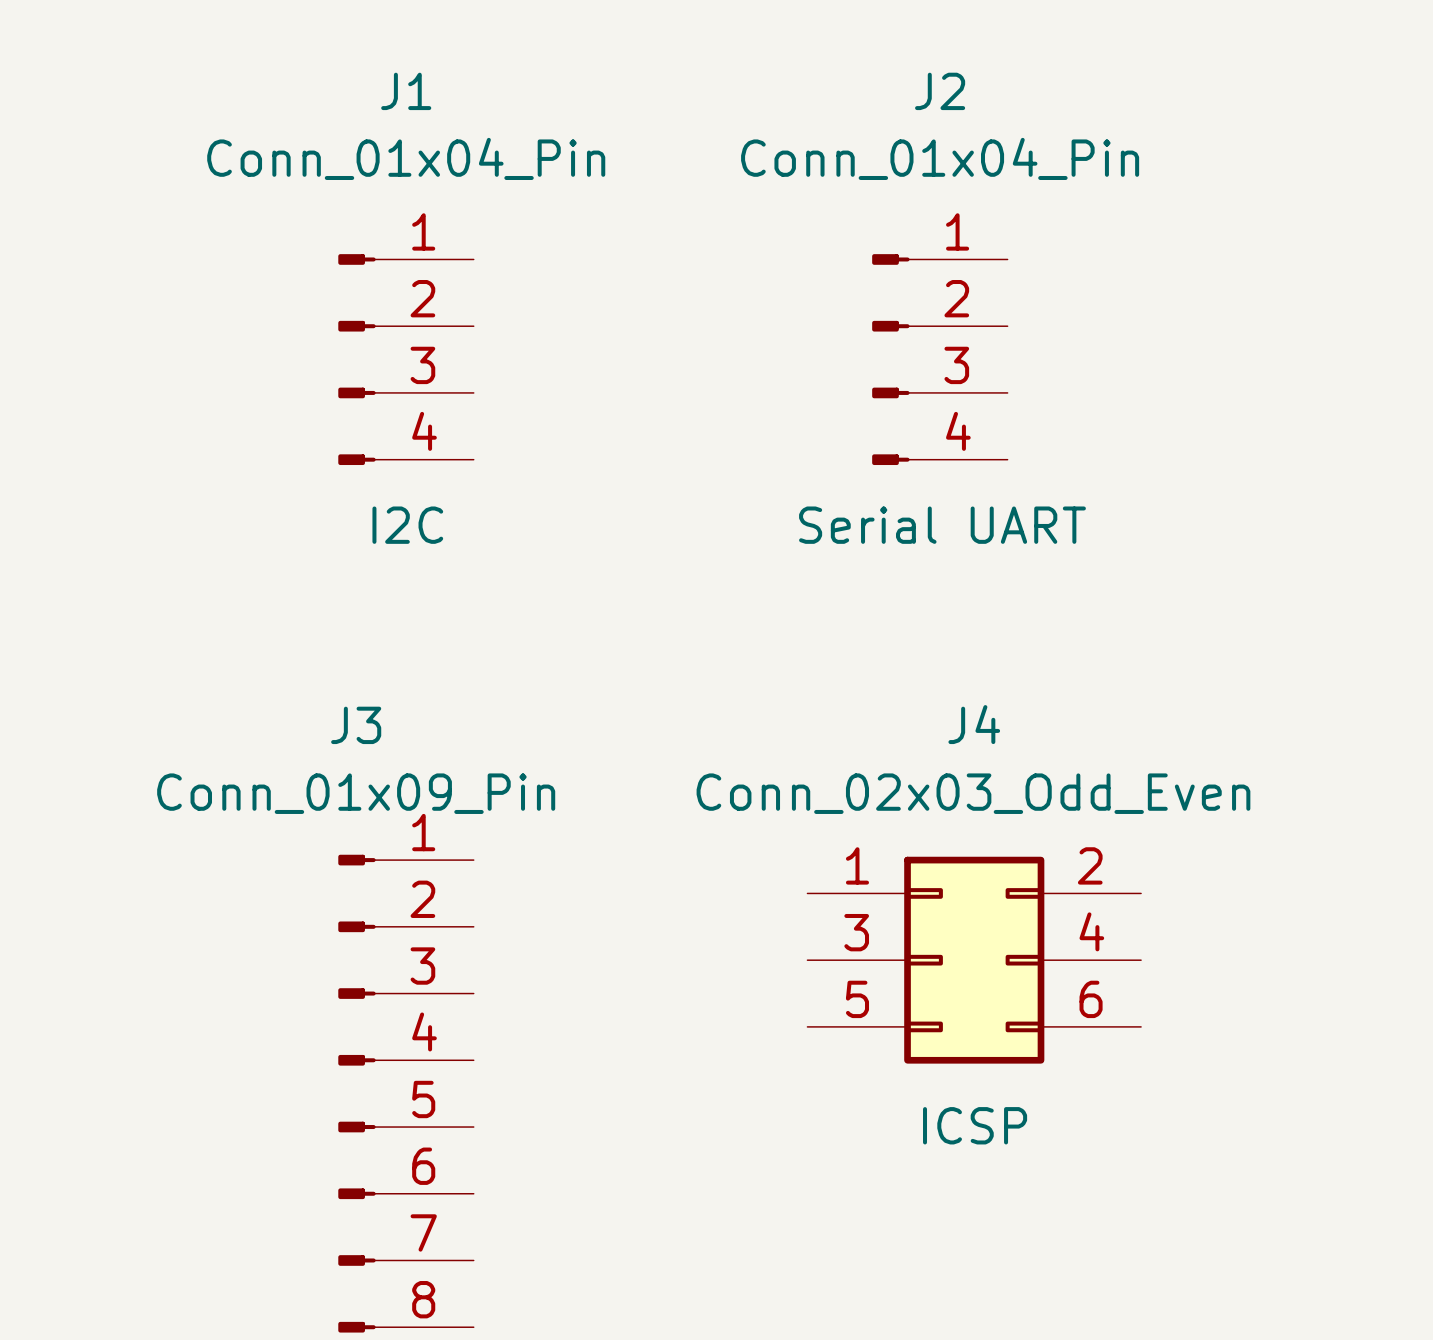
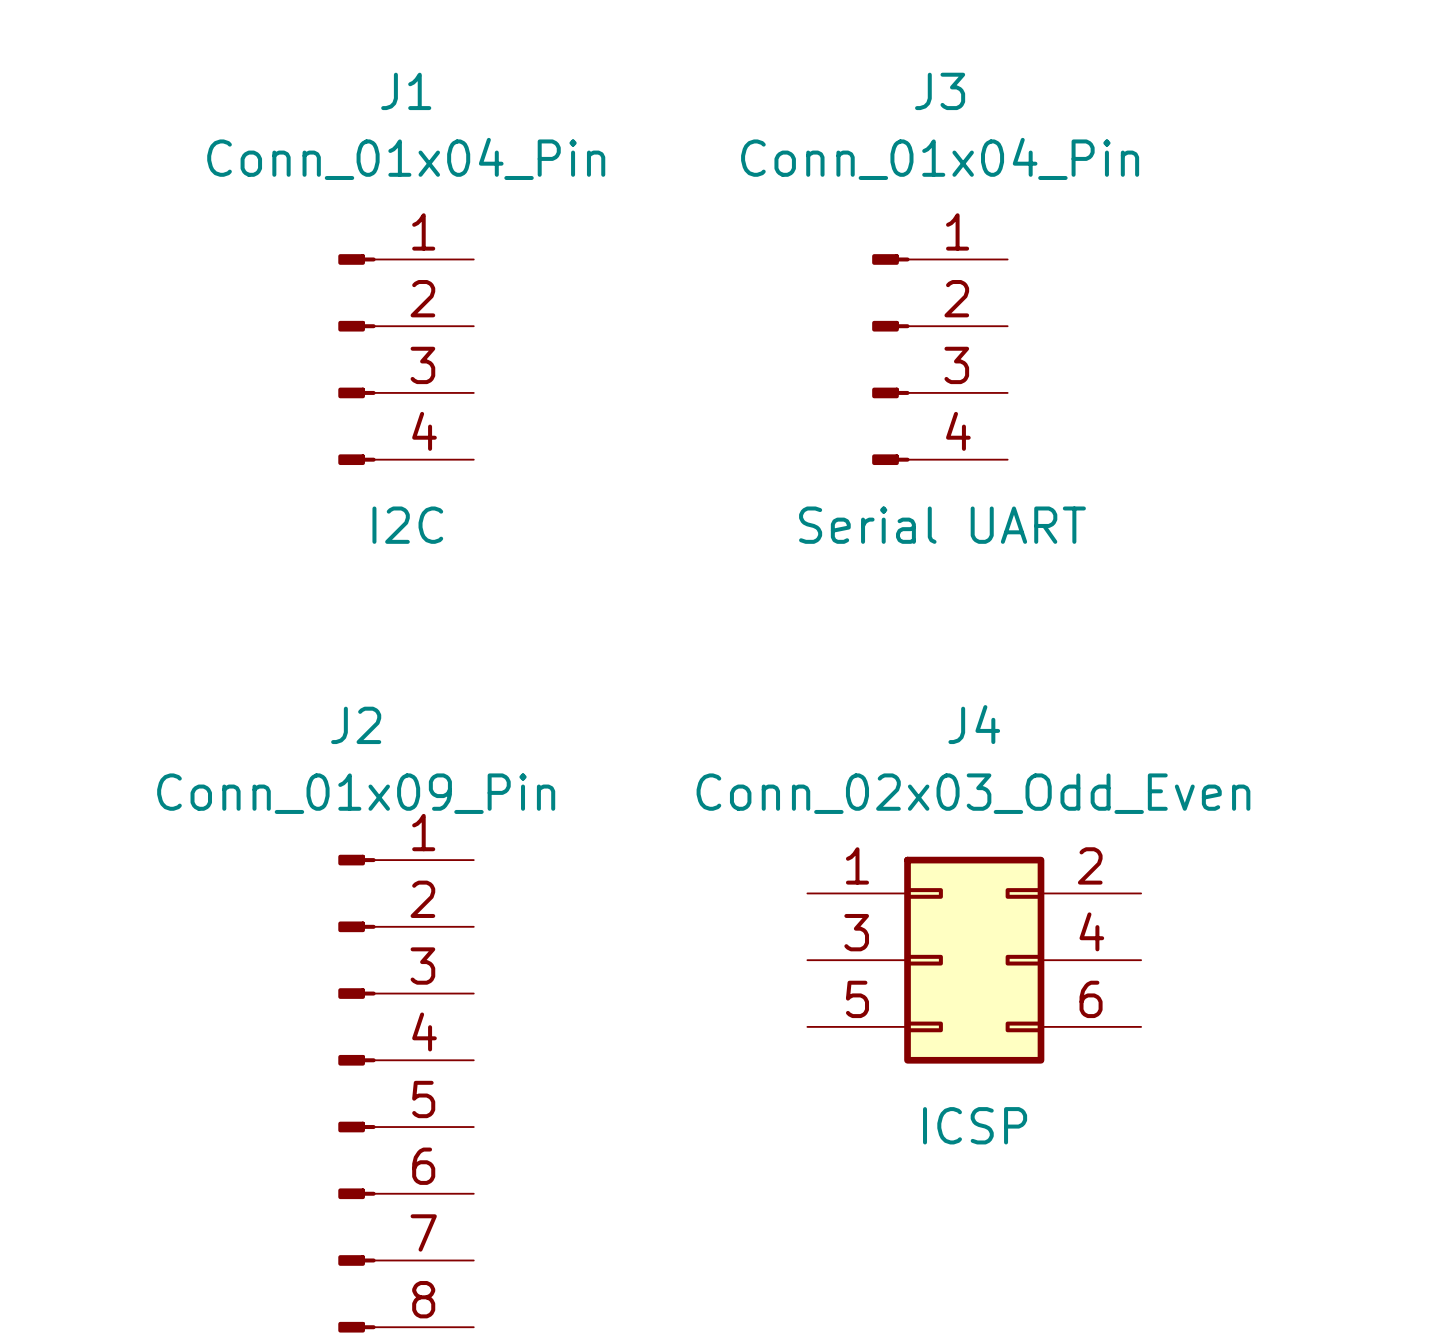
J2 name: J2 (940, 91) -> J3 (940, 91)
J3 name: J3 (356, 725) -> J2 (356, 725)

